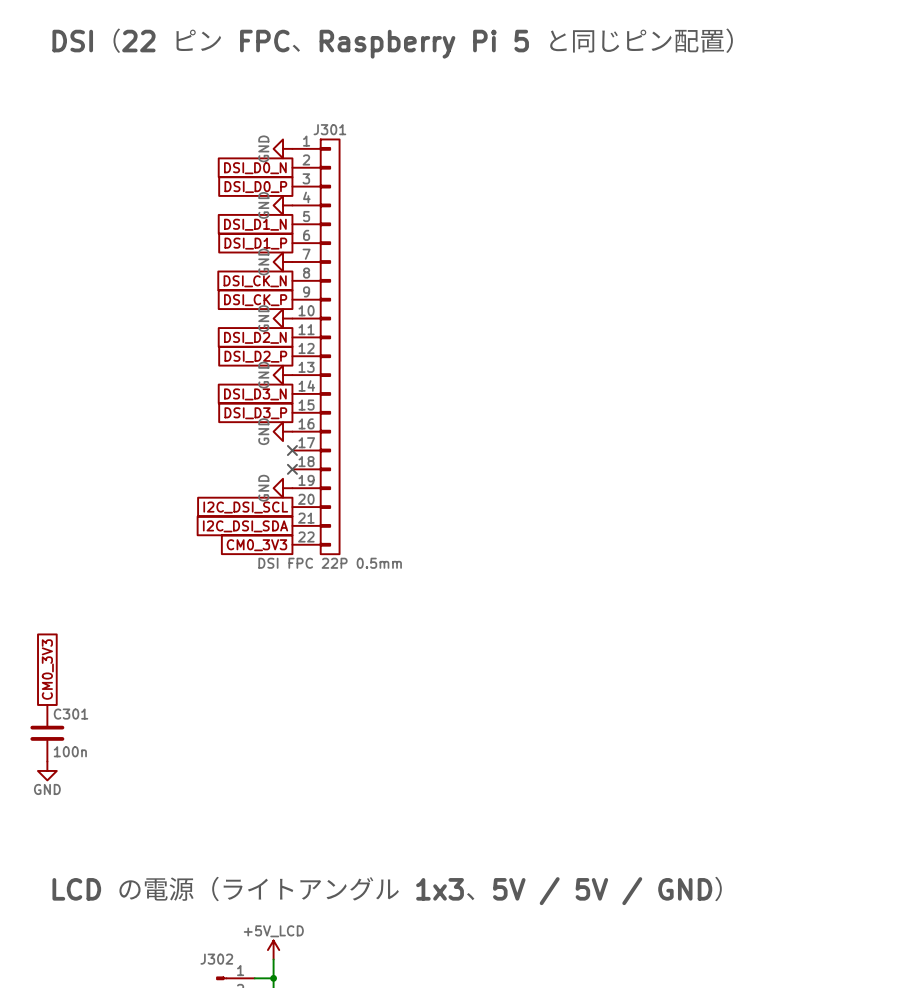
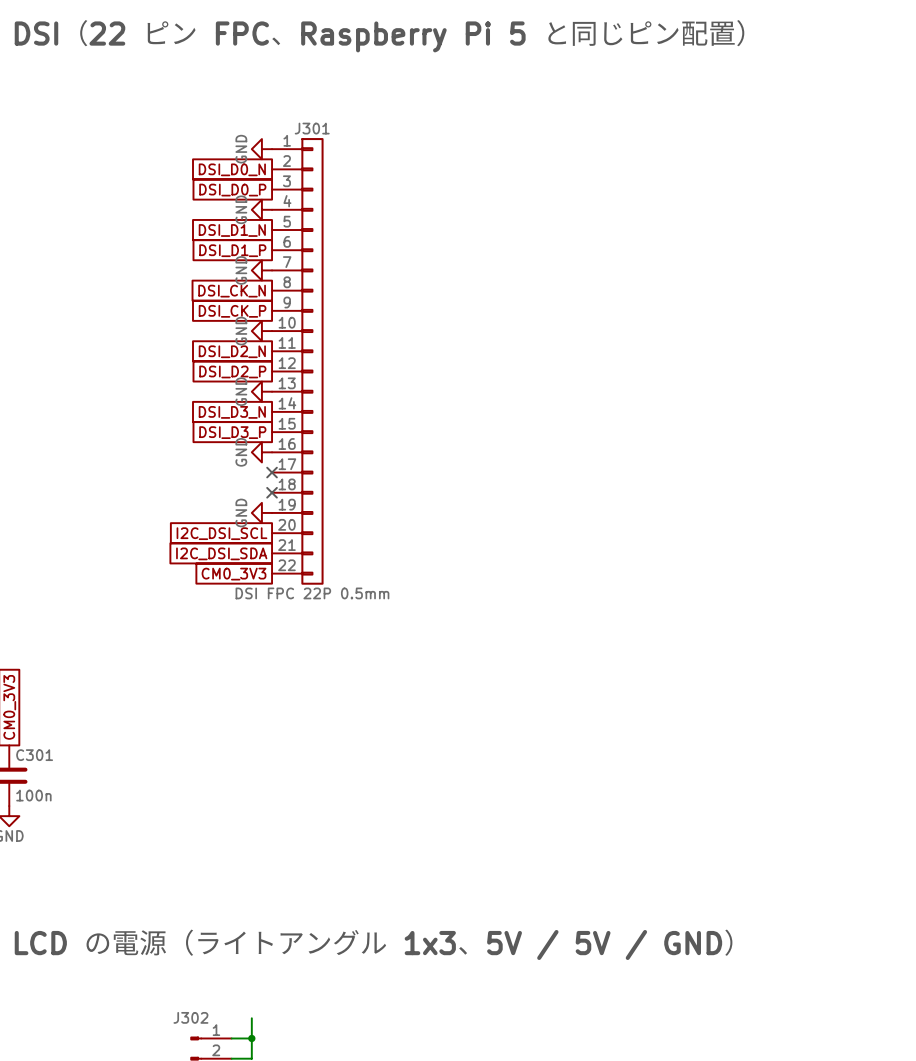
power symbol: +5V_LCD (273, 950) -> none

